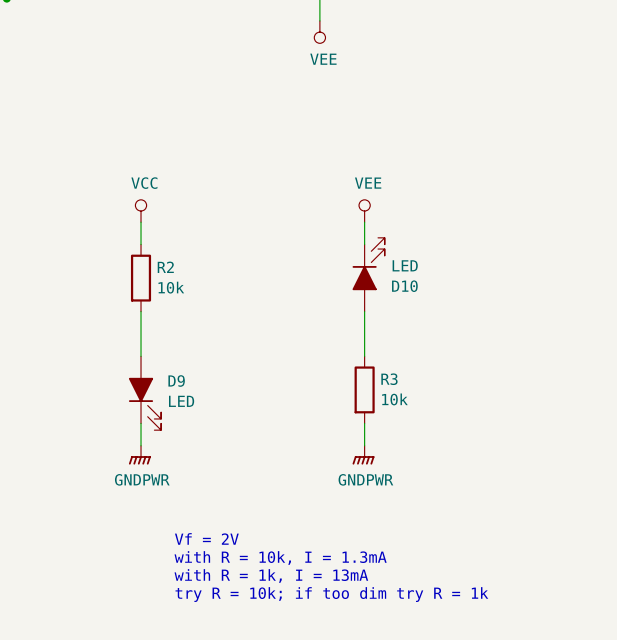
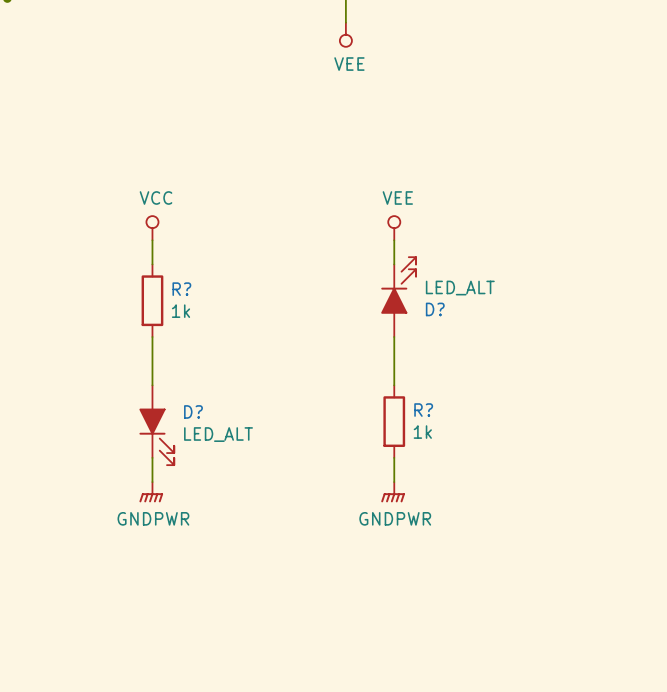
D10 value: LED (405, 265) -> LED_ALT (460, 288)
R2 name: R2 (165, 267) -> R? (181, 289)
D10 name: D10 (404, 286) -> D? (435, 309)
R2 value: 10k (171, 287) -> 1k (181, 311)
R3 name: R3 (389, 379) -> R? (423, 410)
D9 name: D9 (176, 381) -> D? (193, 411)
R3 value: 10k (394, 399) -> 1k (422, 432)
D9 value: LED (181, 401) -> LED_ALT (218, 434)
text: Vf = 2V (206, 538) -> none
text: with R = 10k, I = 1.3mA (280, 558) -> none
text: with R = 1k, I = 13mA (271, 576) -> none
text: try R = 10k; if too dim try R = 1k (331, 594) -> none

